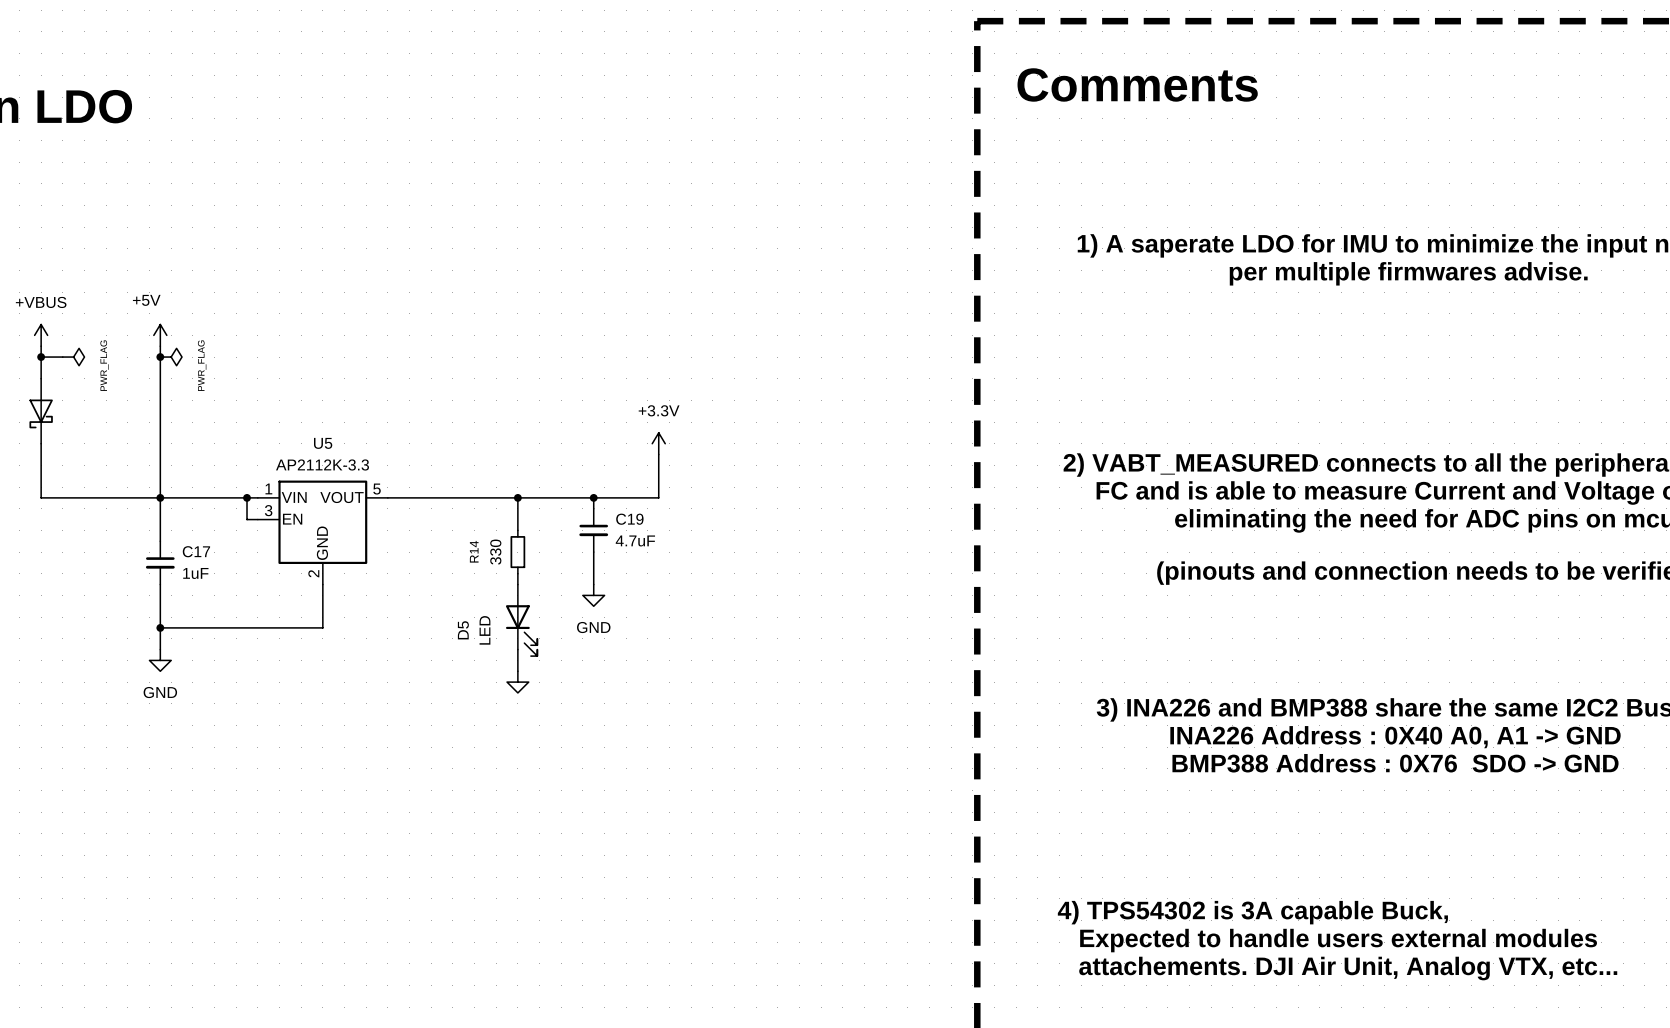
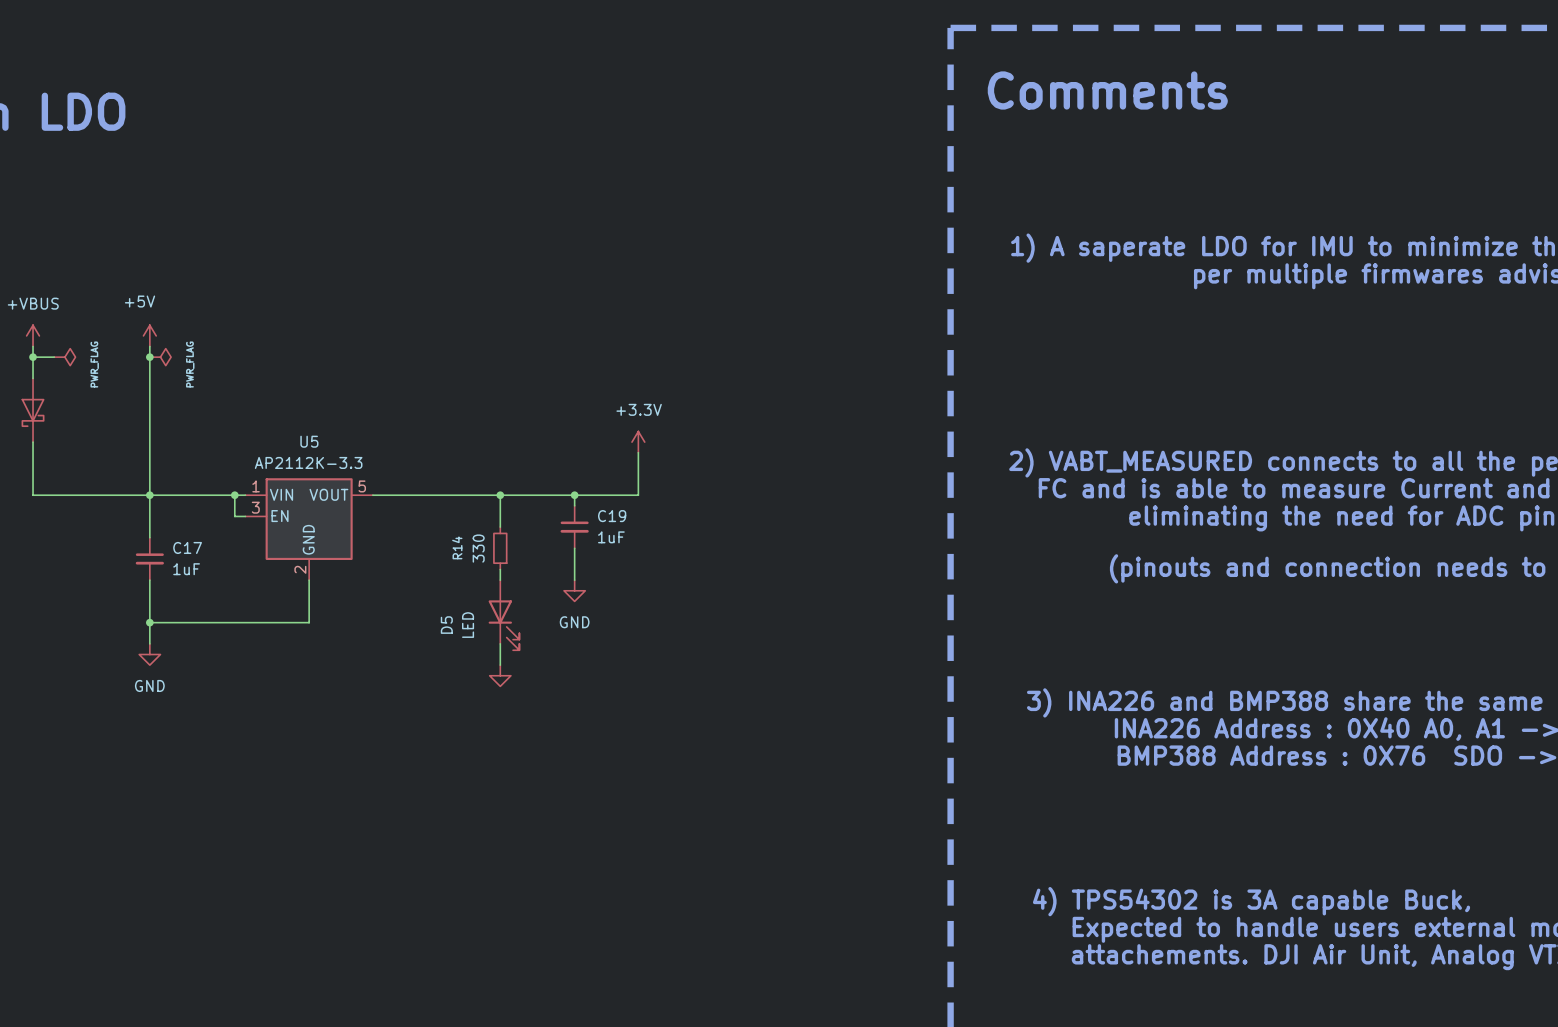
C19 value: 4.7uF (635, 540) -> 1uF (611, 537)

